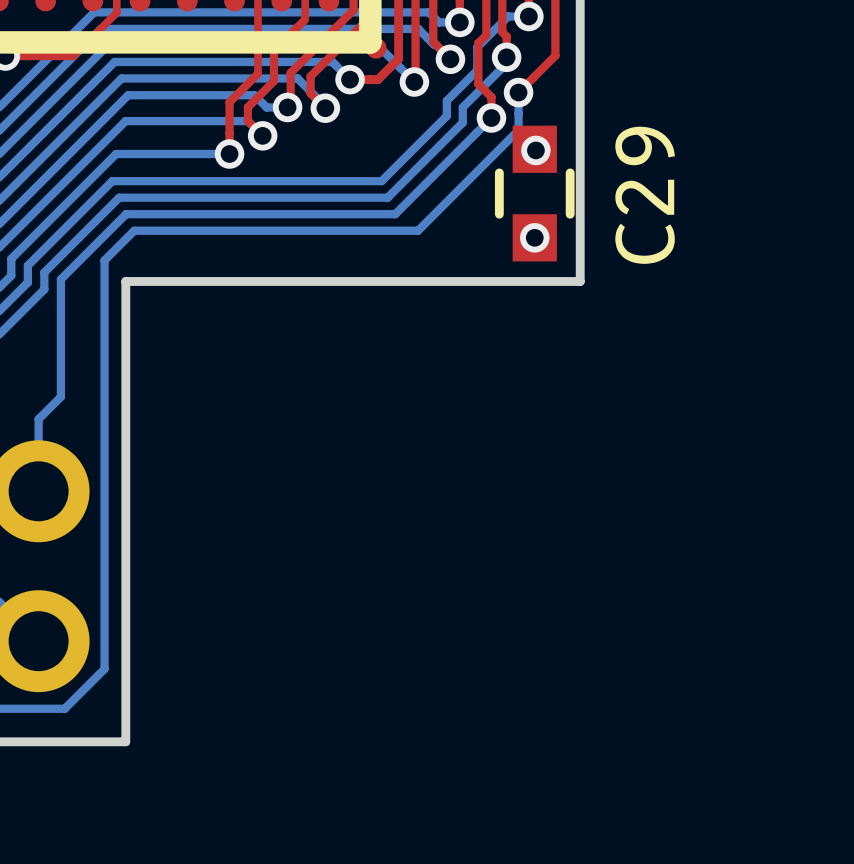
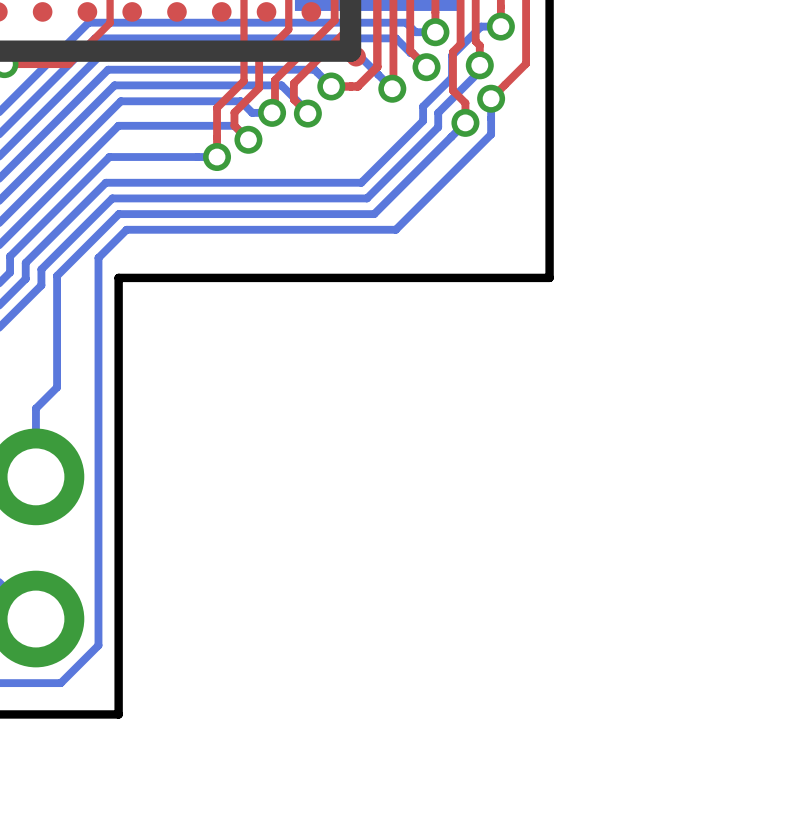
via: (535, 150) -> none
C29: (534, 193) -> none
via: (534, 237) -> none

